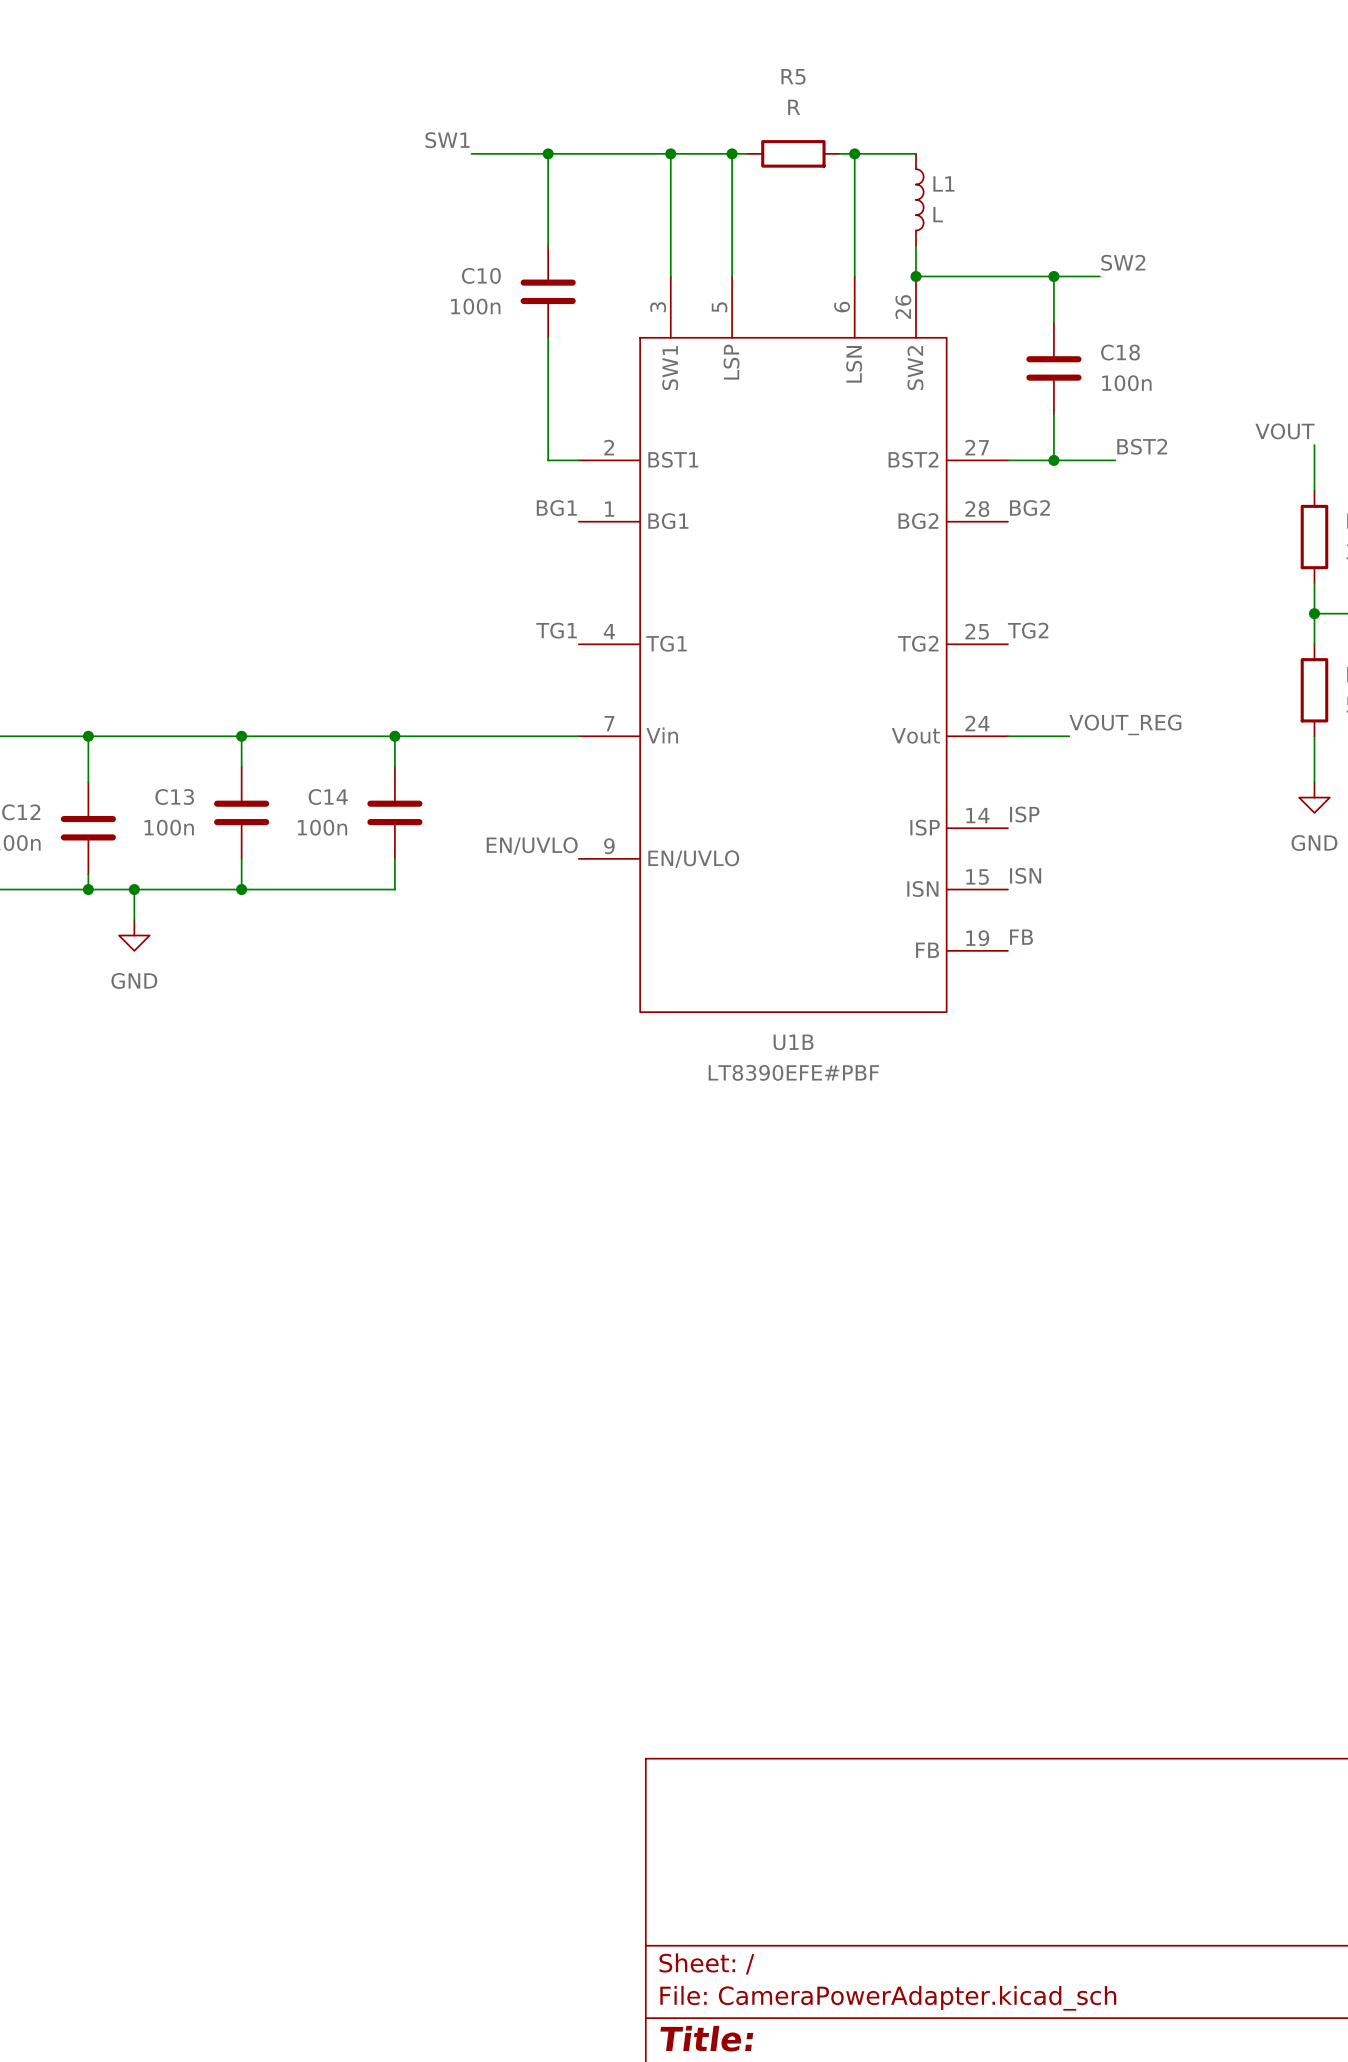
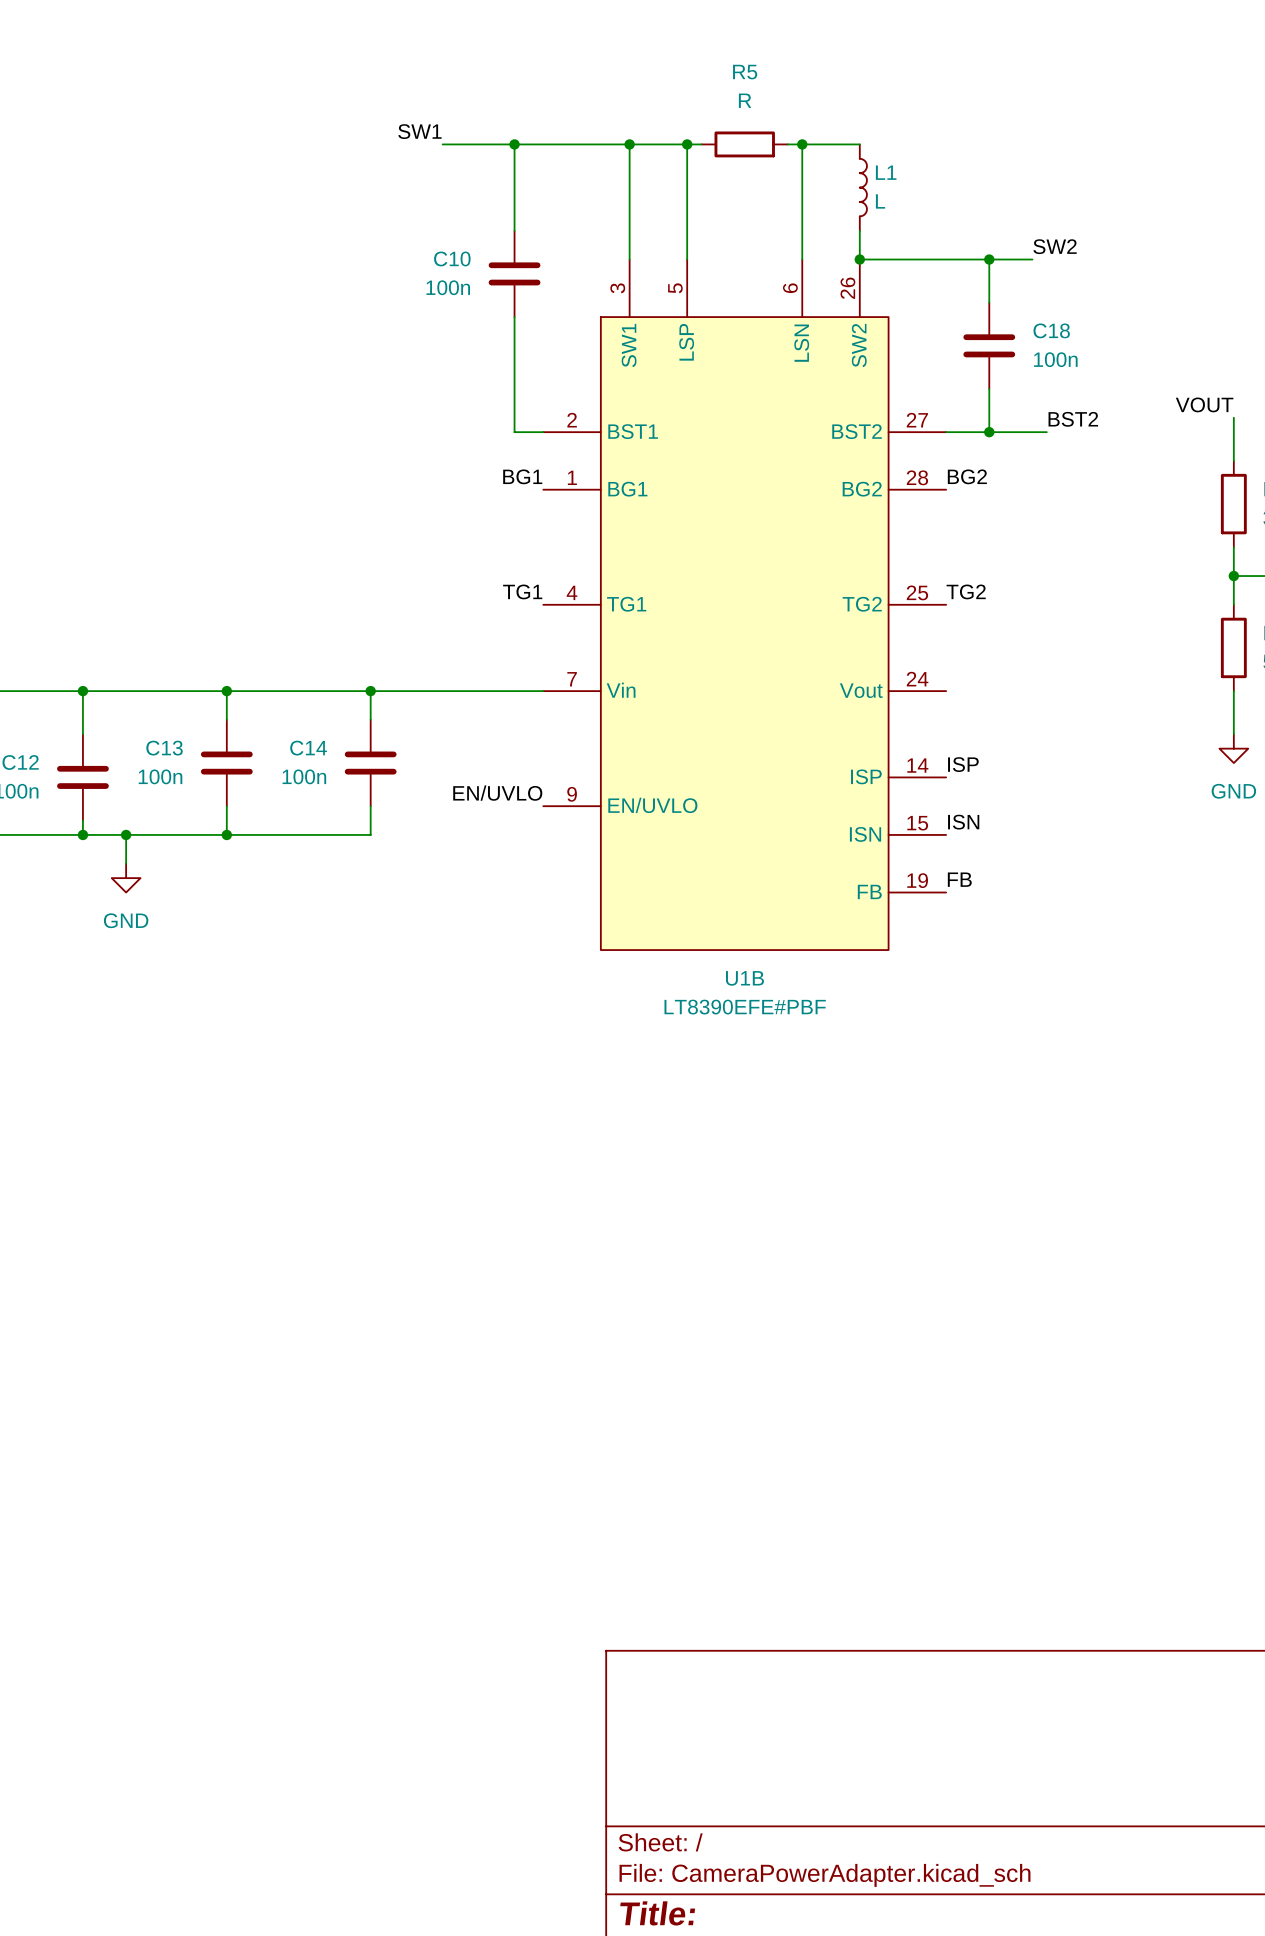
label: VOUT_REG (1125, 724) -> none
wire: (1007, 736) (1069, 736) -> none

